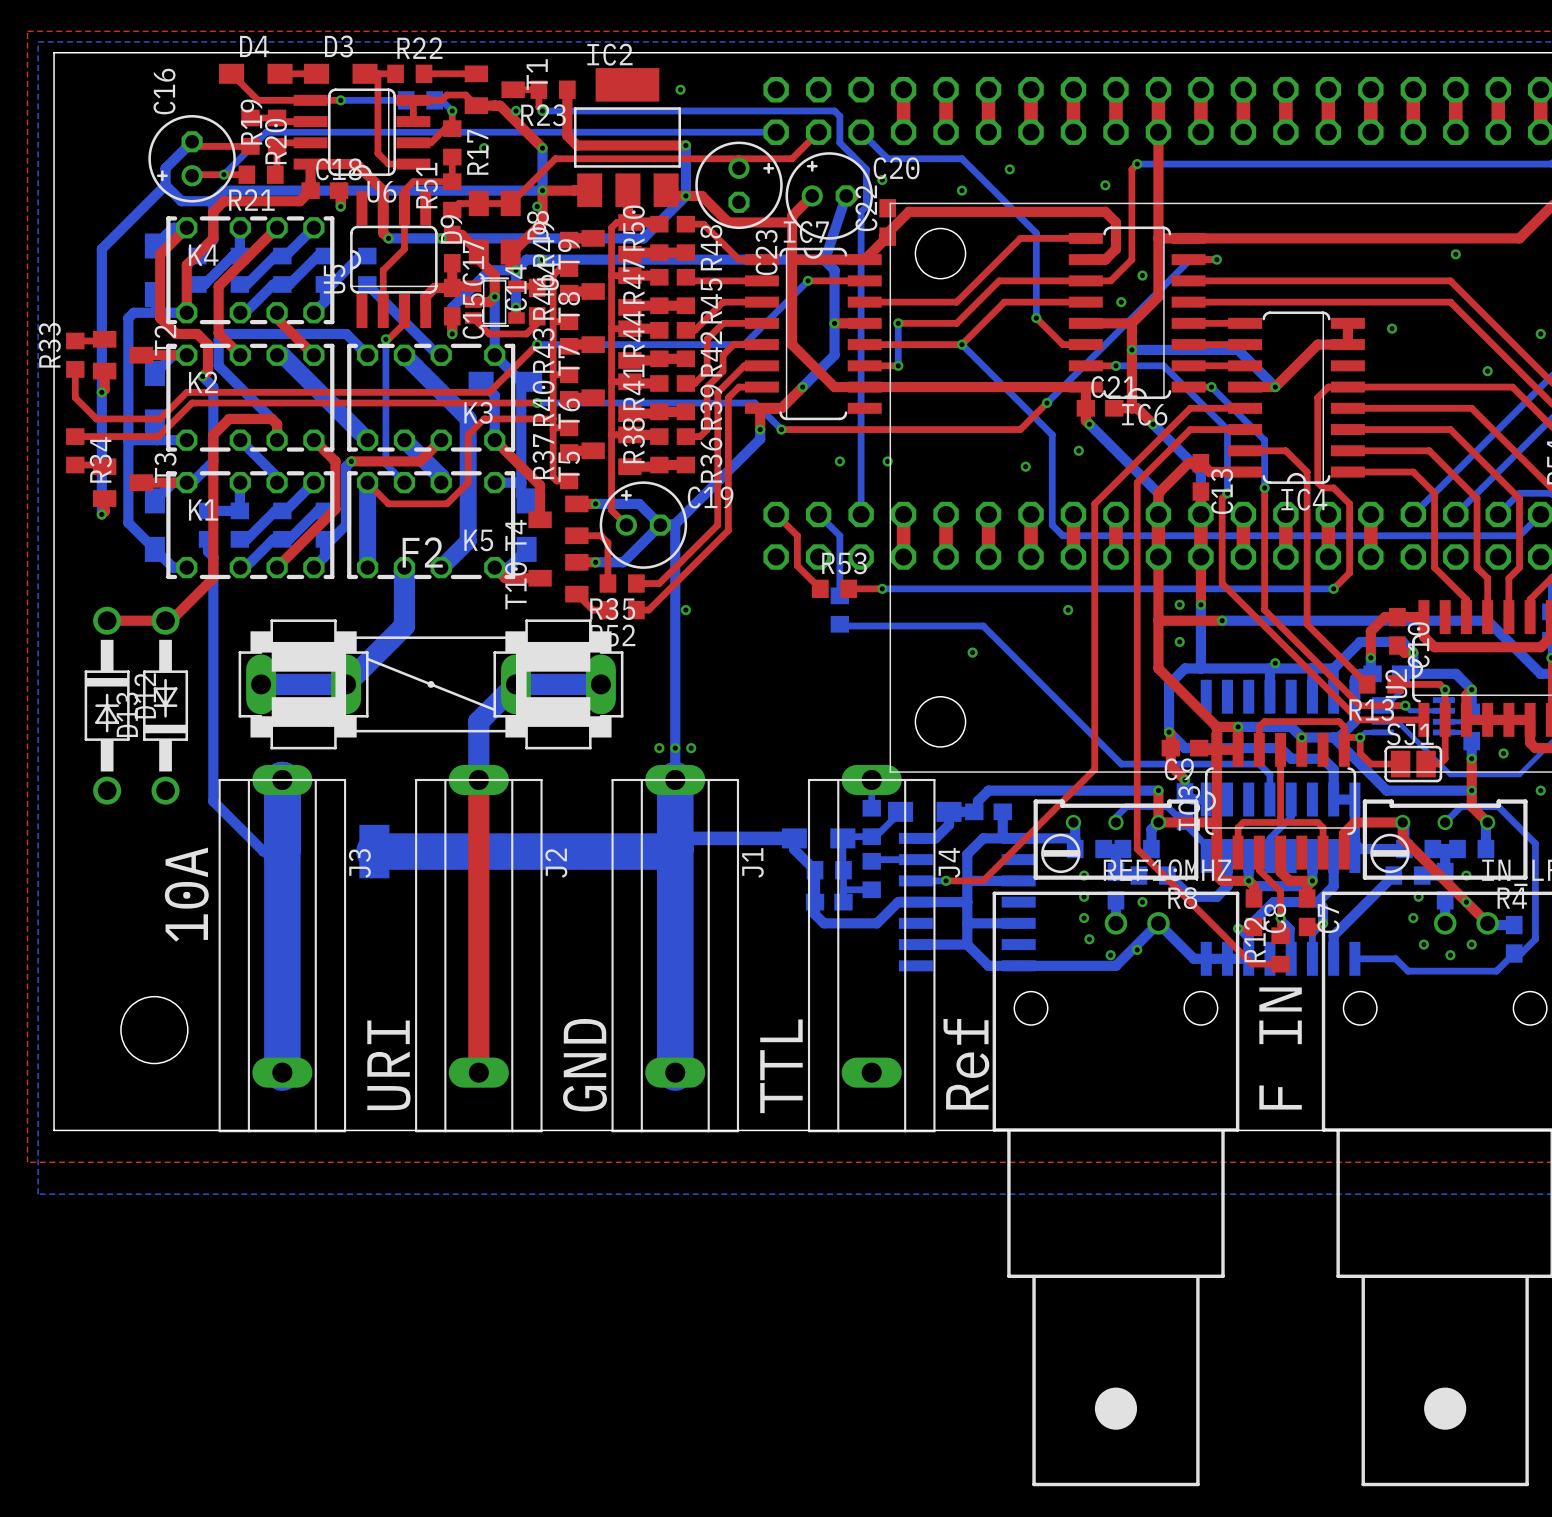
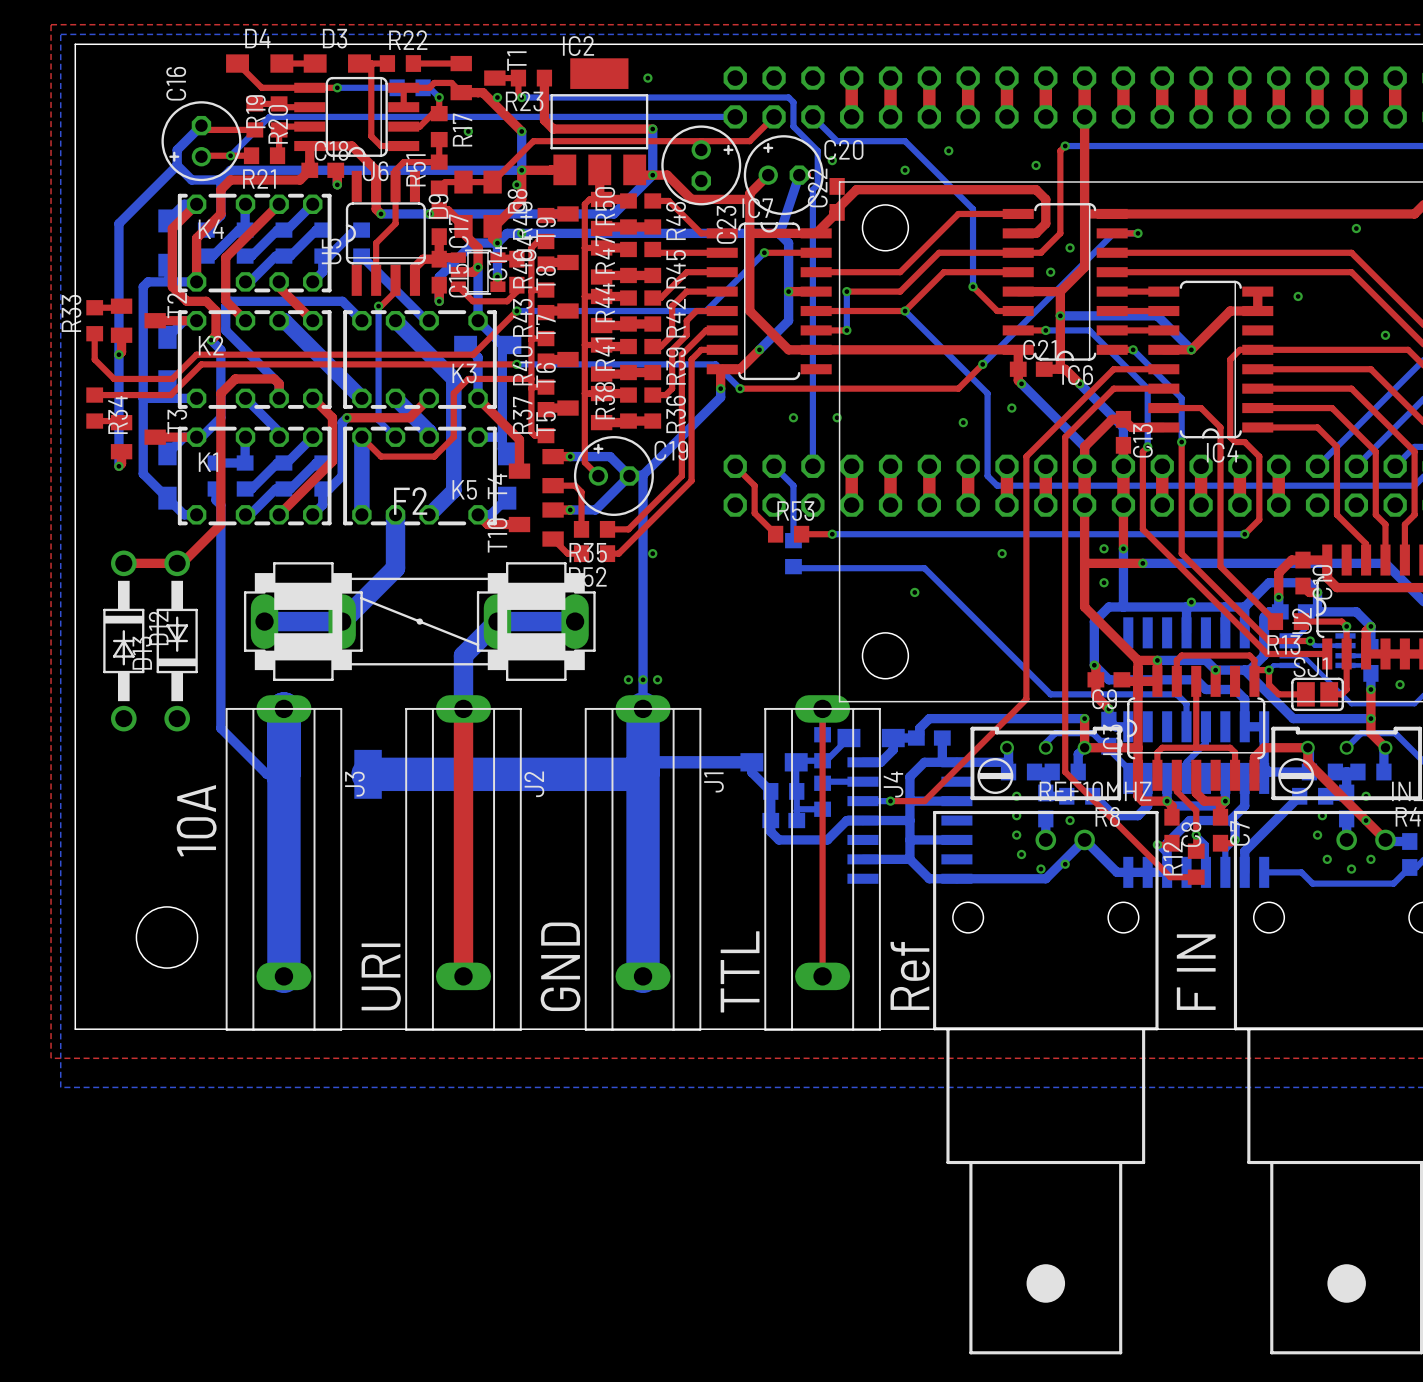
top track: none -> (822, 708) (822, 976)

